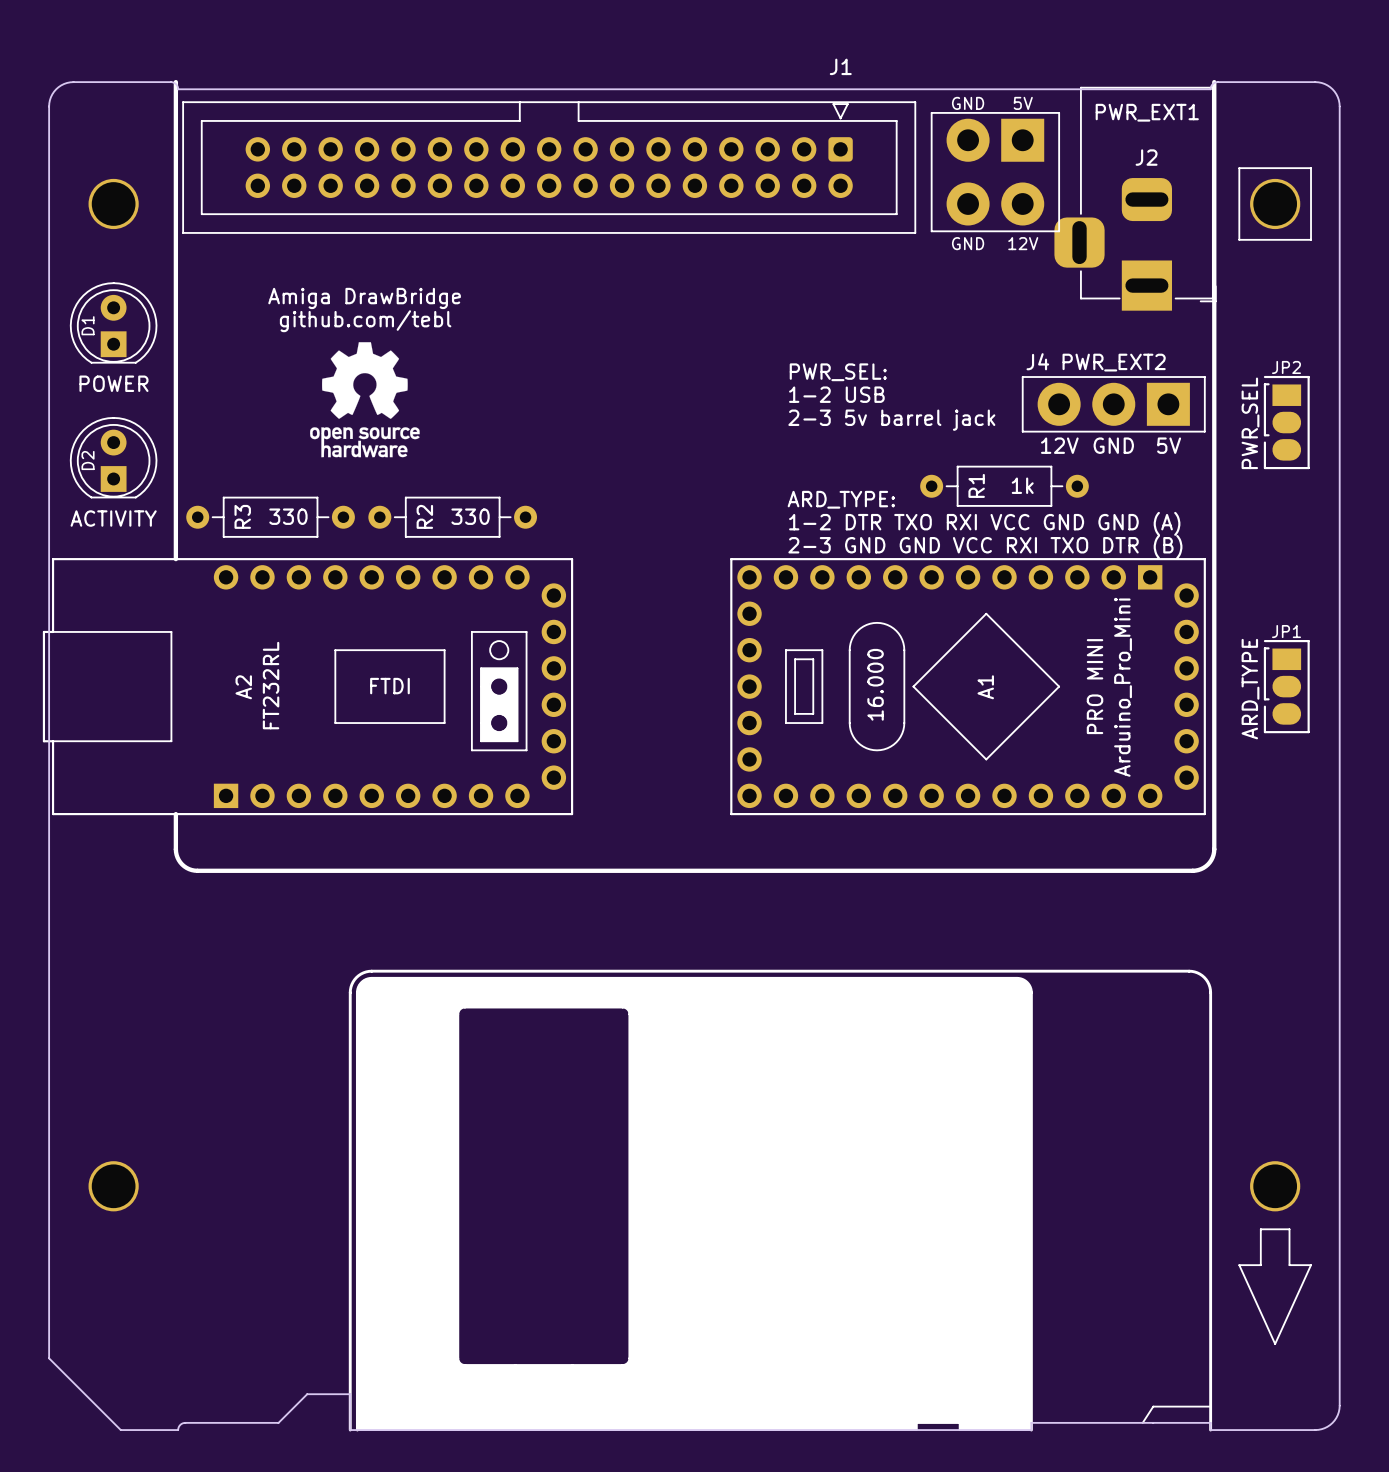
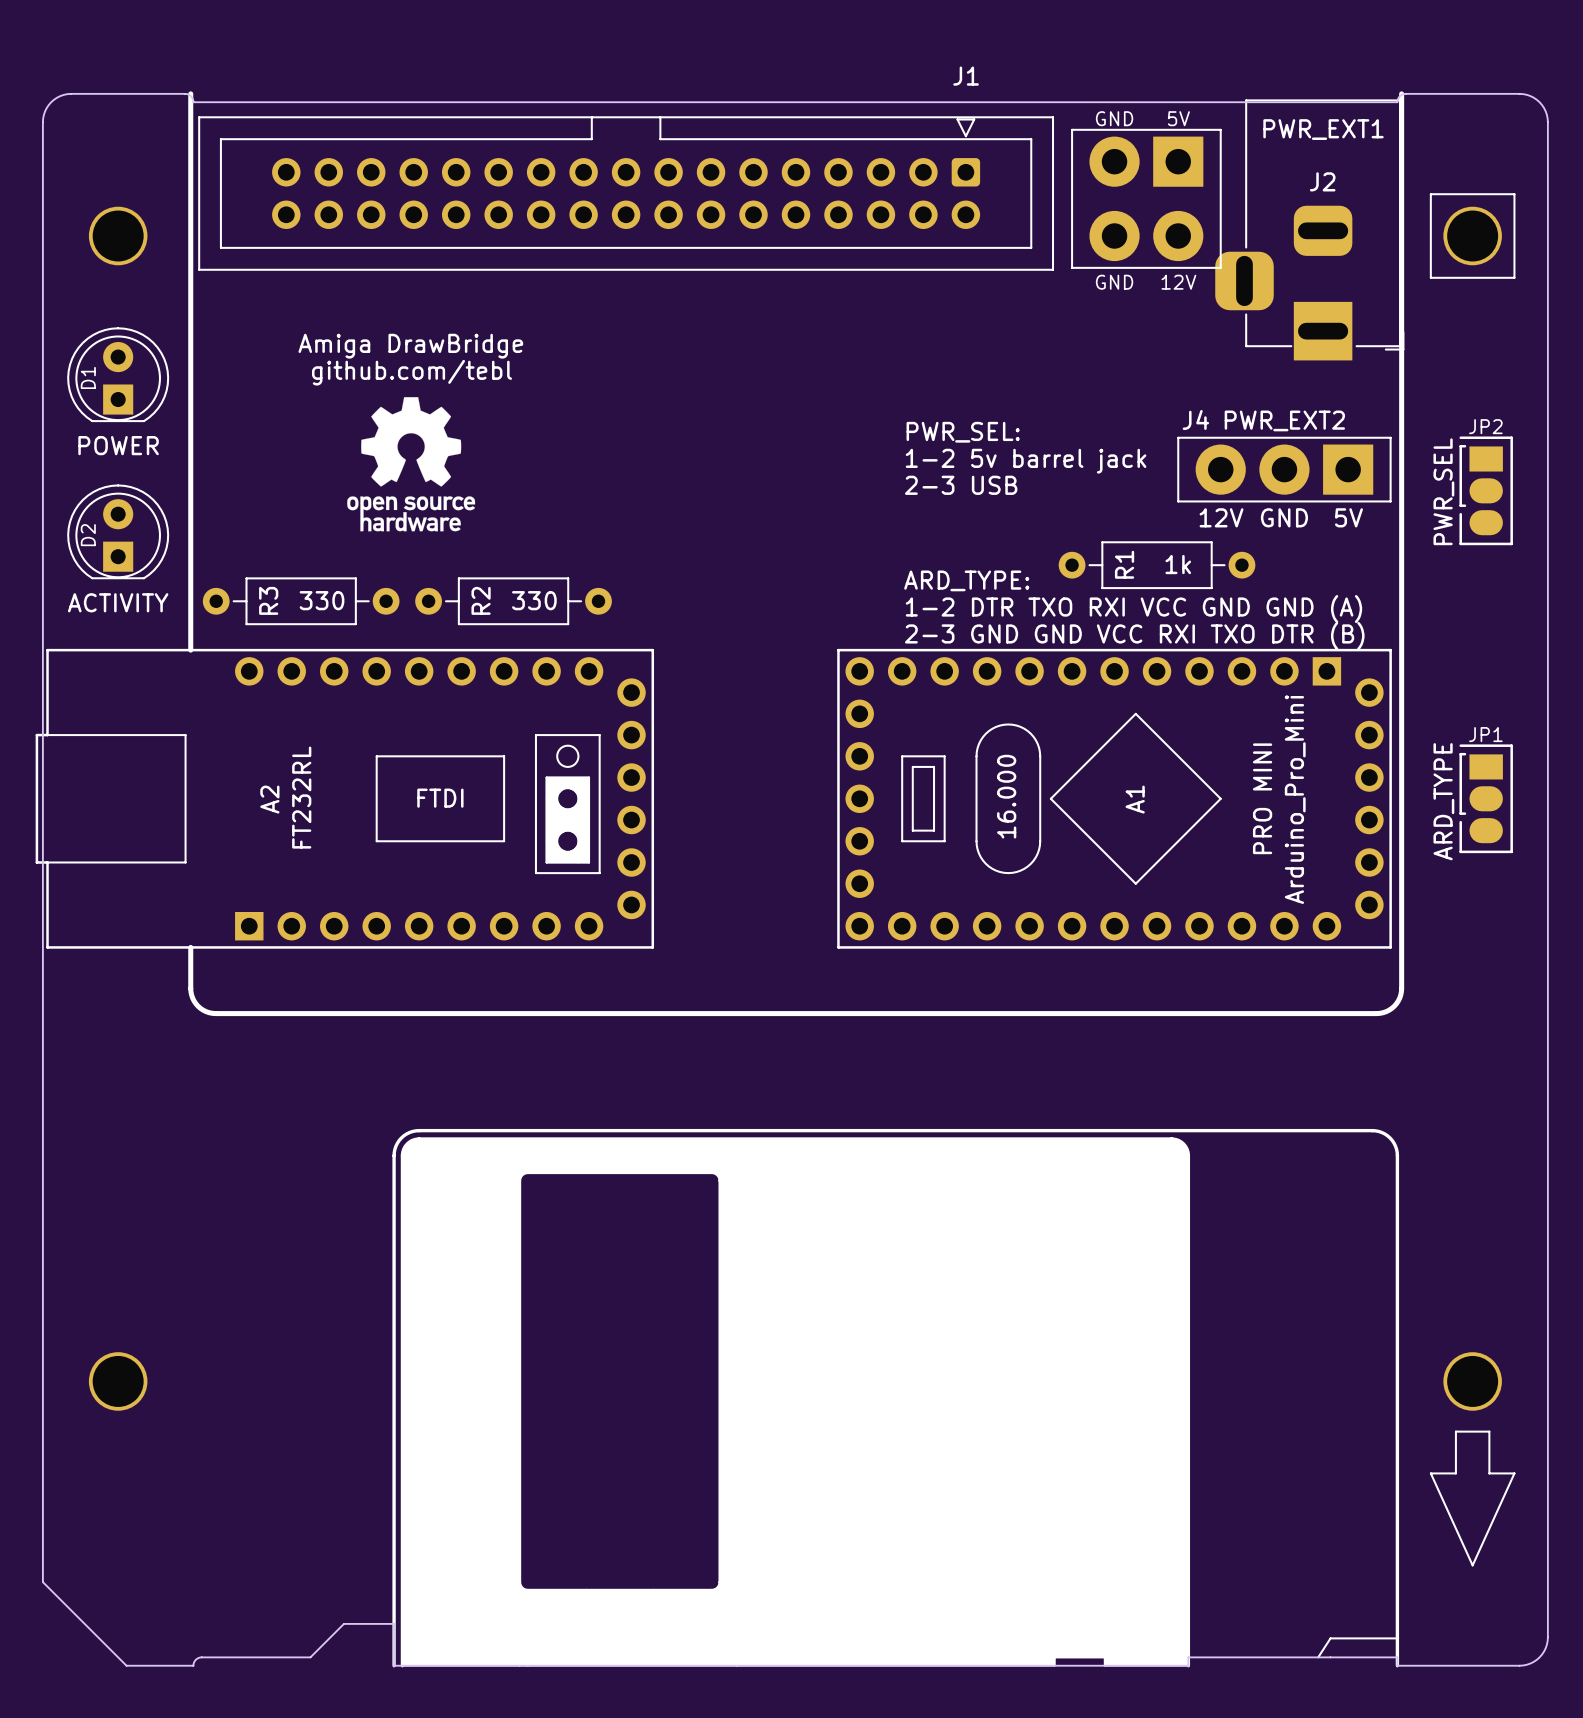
text: 1-2 USB (836, 394) -> 1-2 5v barrel jack (1026, 461)
text: 2-3 5v barrel jack (891, 420) -> 2-3 USB (961, 485)

